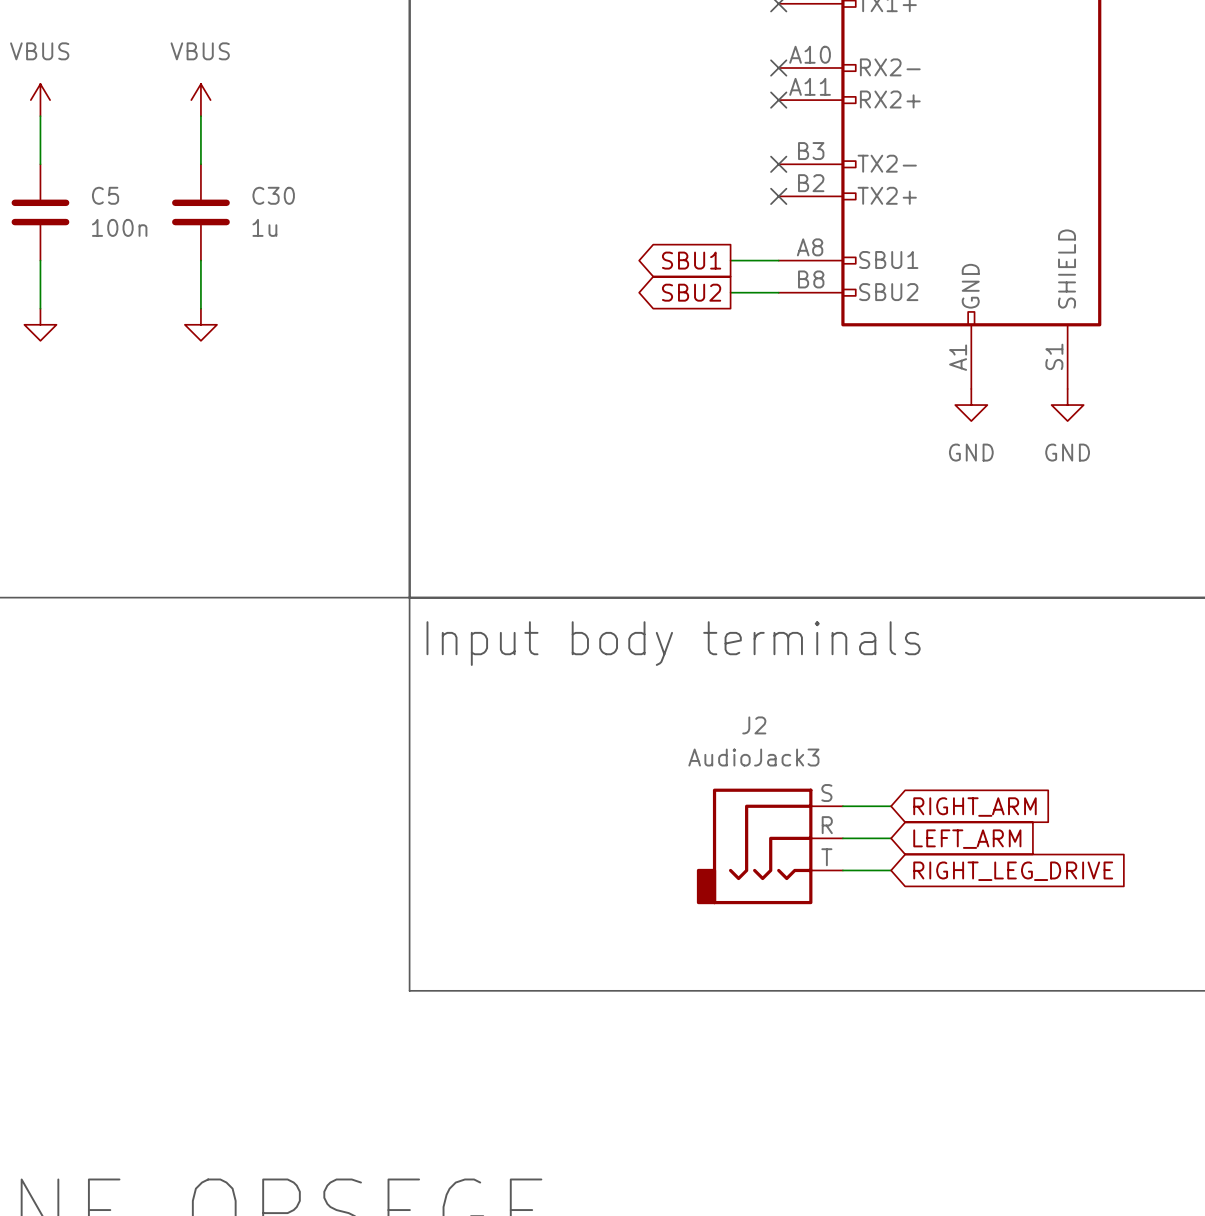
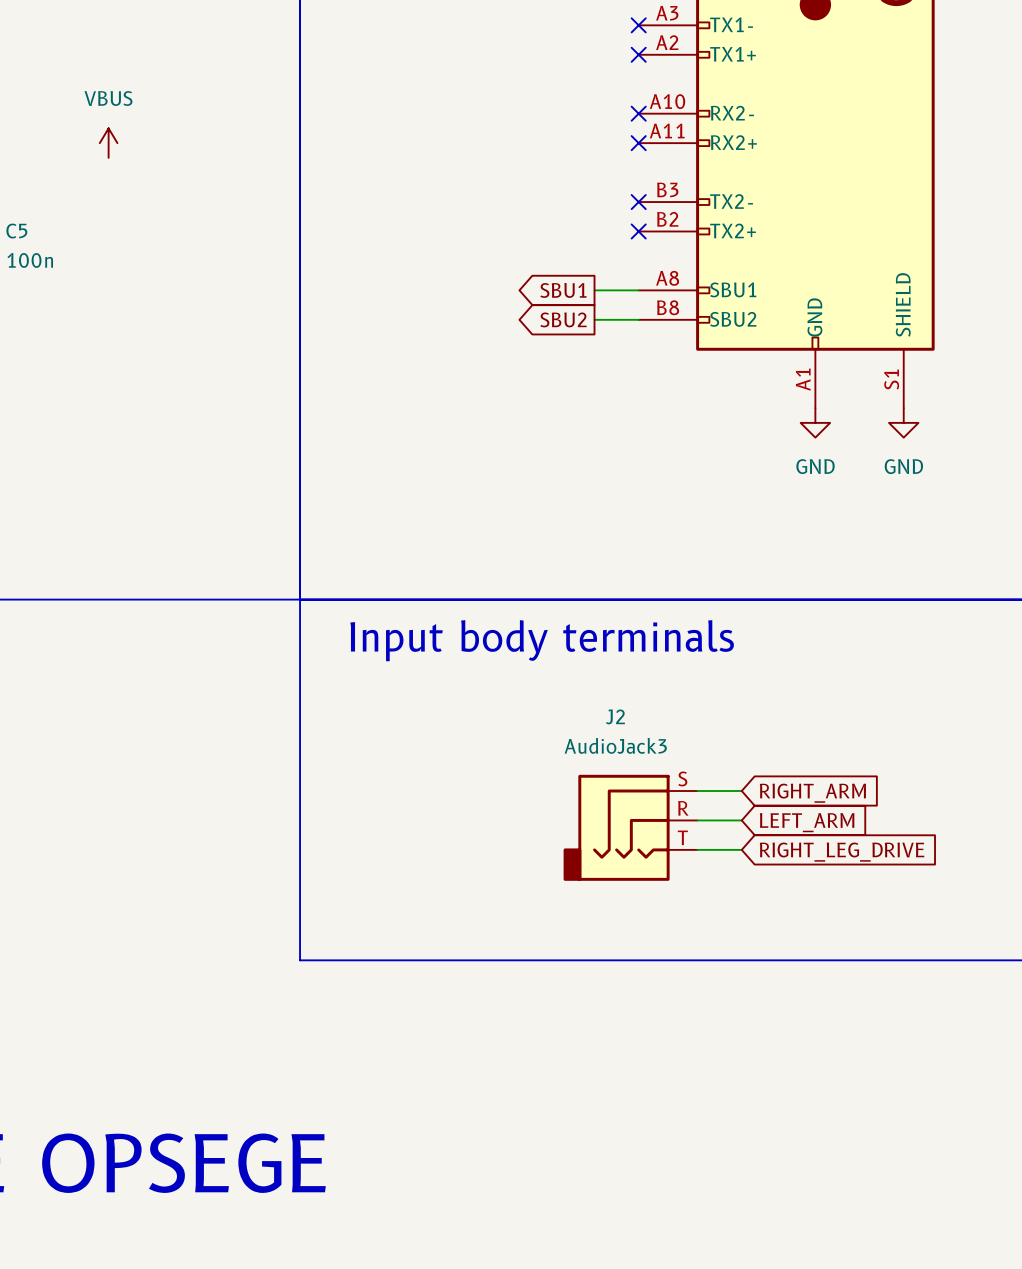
wire: (200, 116) (200, 164) -> none
C30: 1u (200, 212) -> none
wire: (200, 260) (200, 308) -> none
power symbol: (200, 324) -> none

